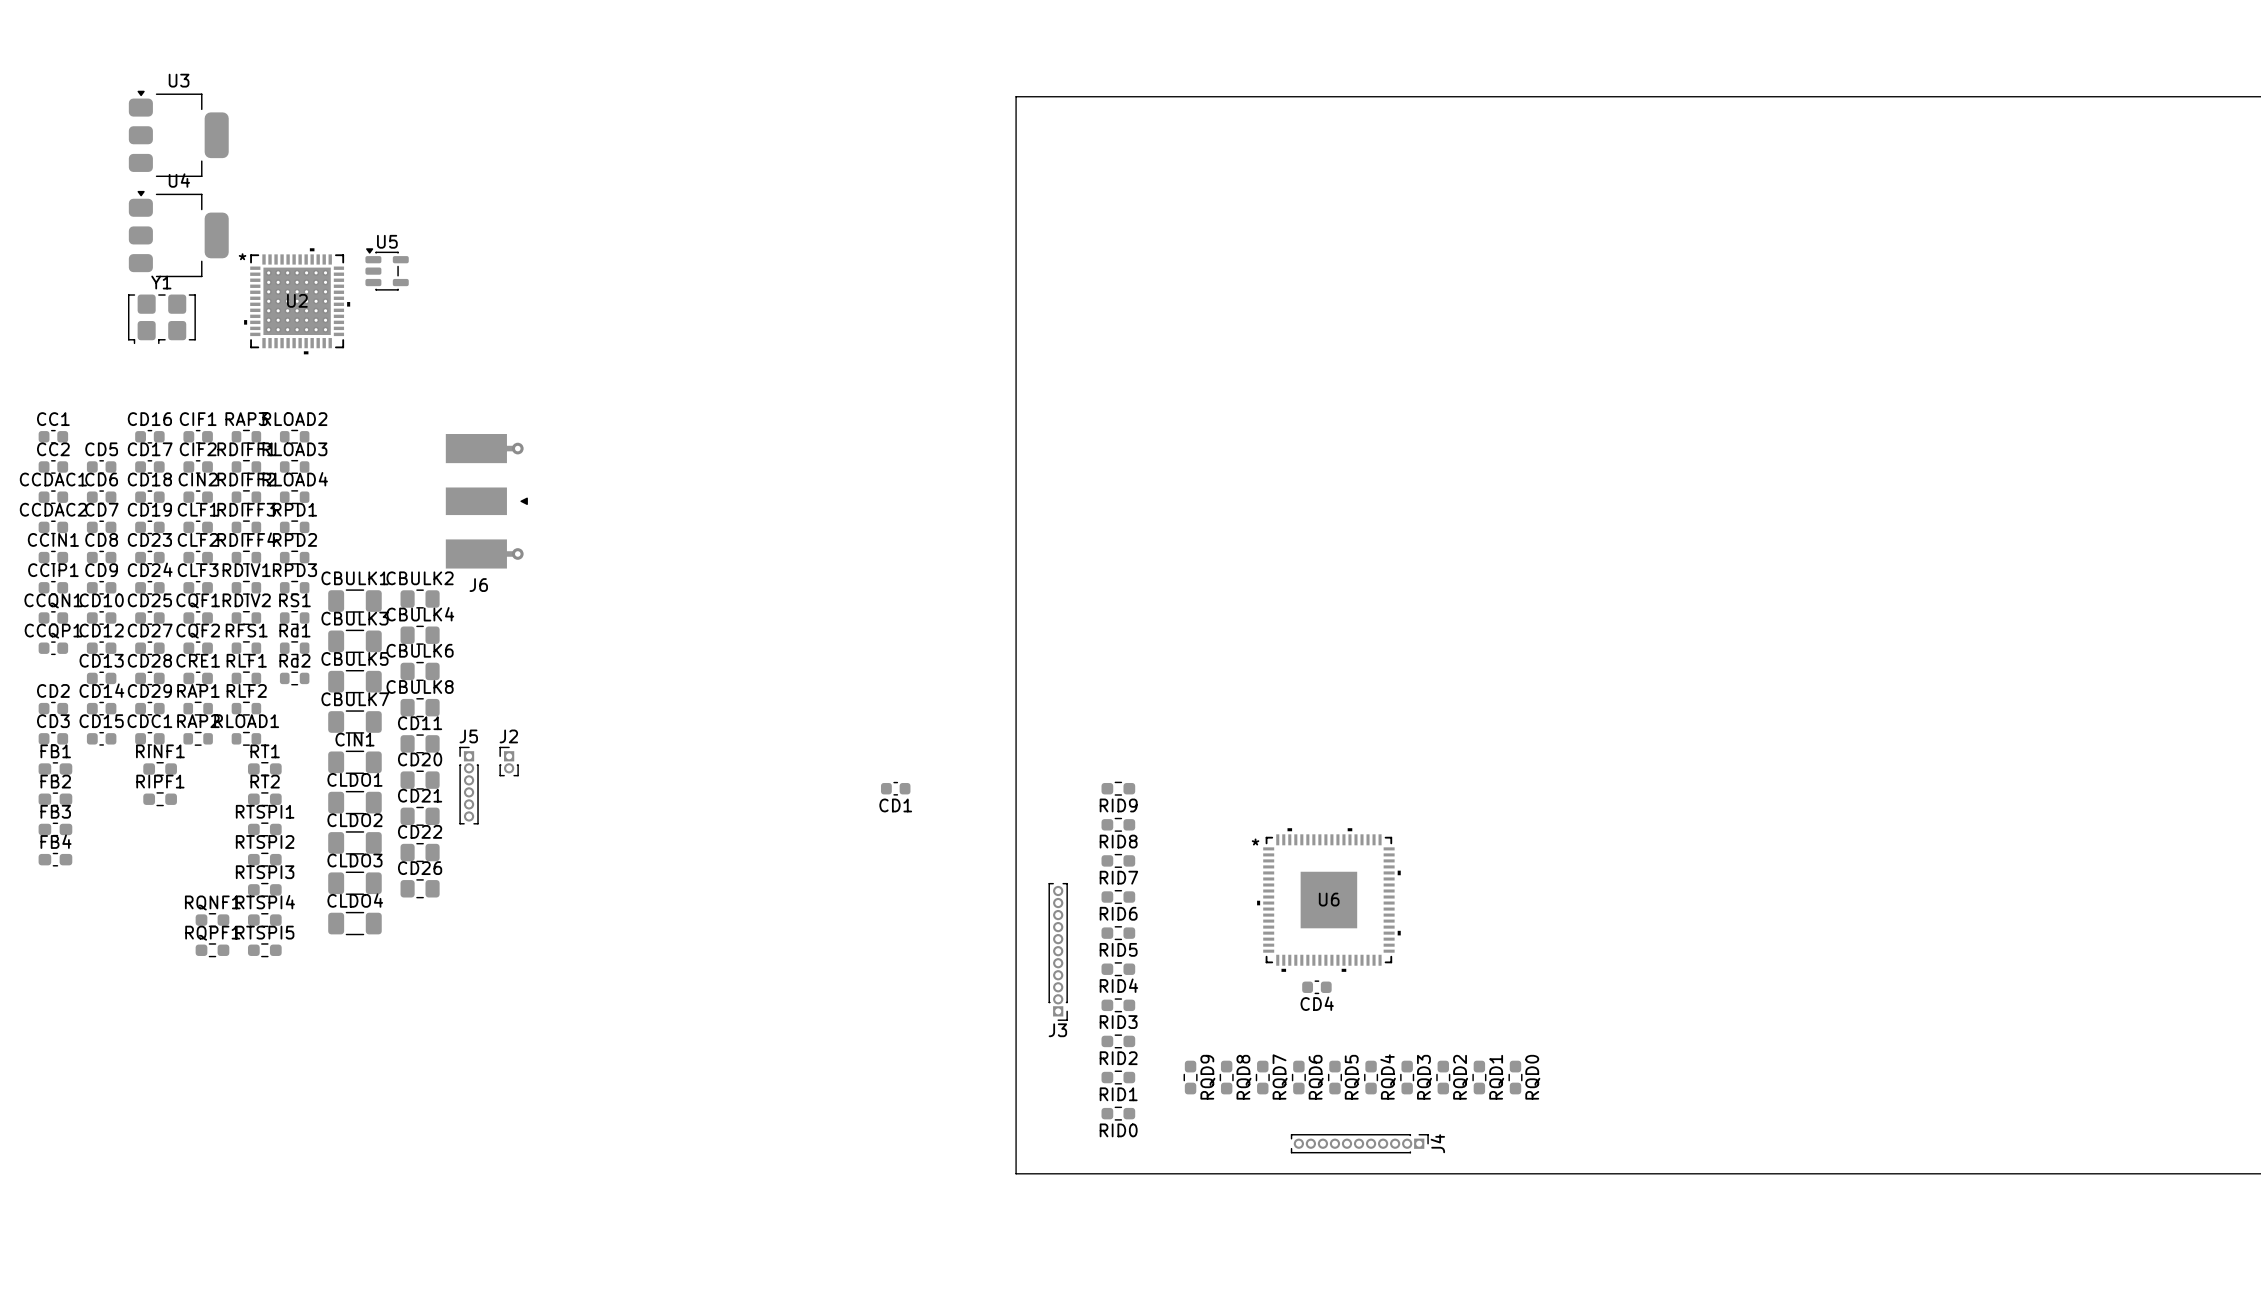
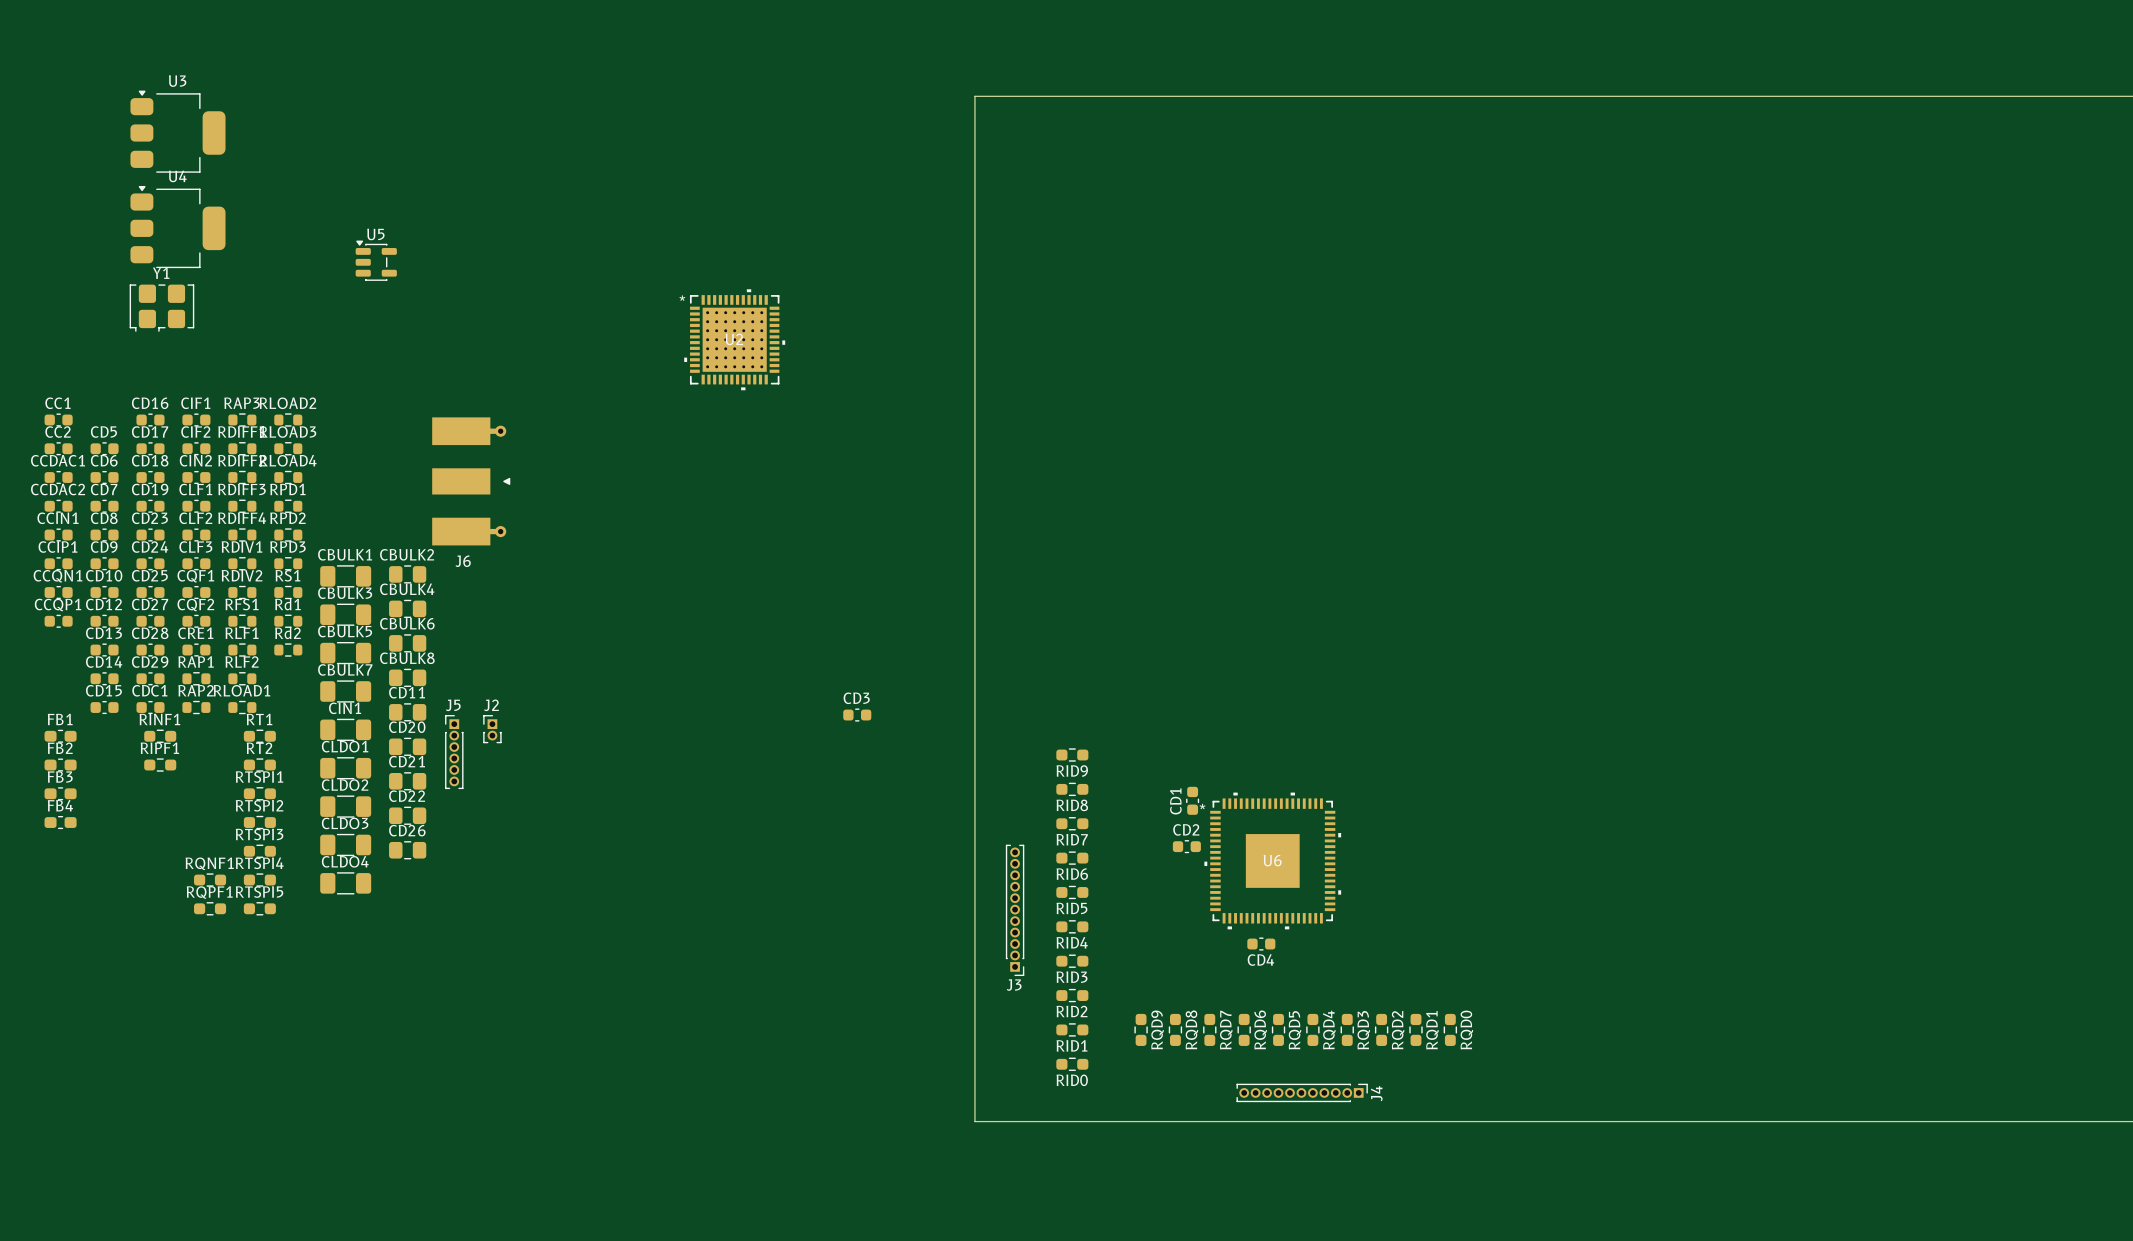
U2 position: (297, 301) -> (734, 339)
CD2 position: (53, 708) -> (1186, 846)
CD3 position: (53, 738) -> (857, 715)
CD1 rotation: 0° (895, 788) -> 90° clockwise (1192, 800)
CD1 position: (895, 788) -> (1192, 800)

